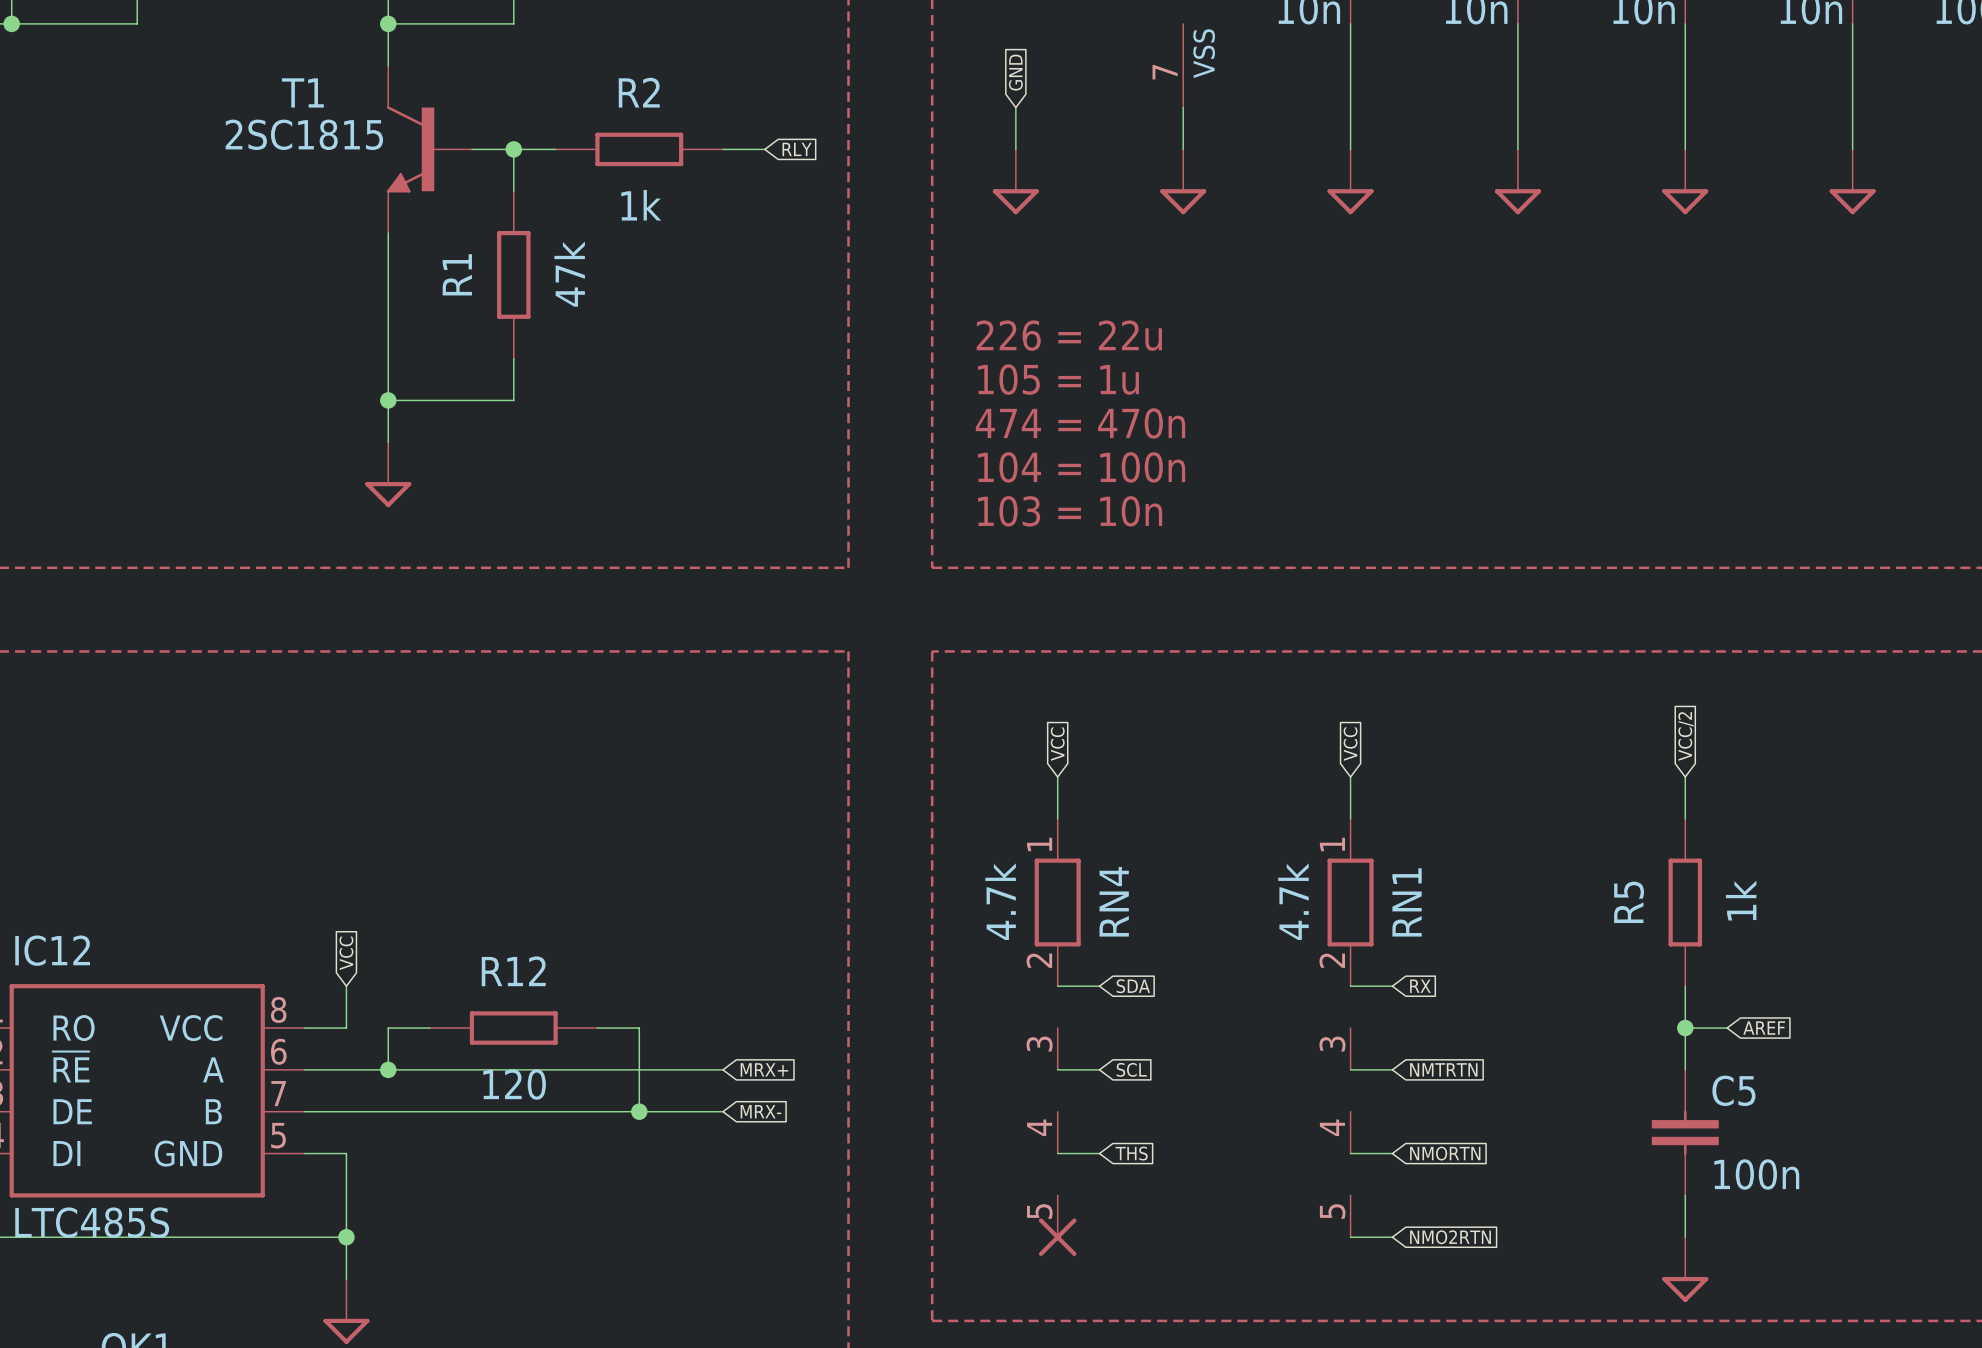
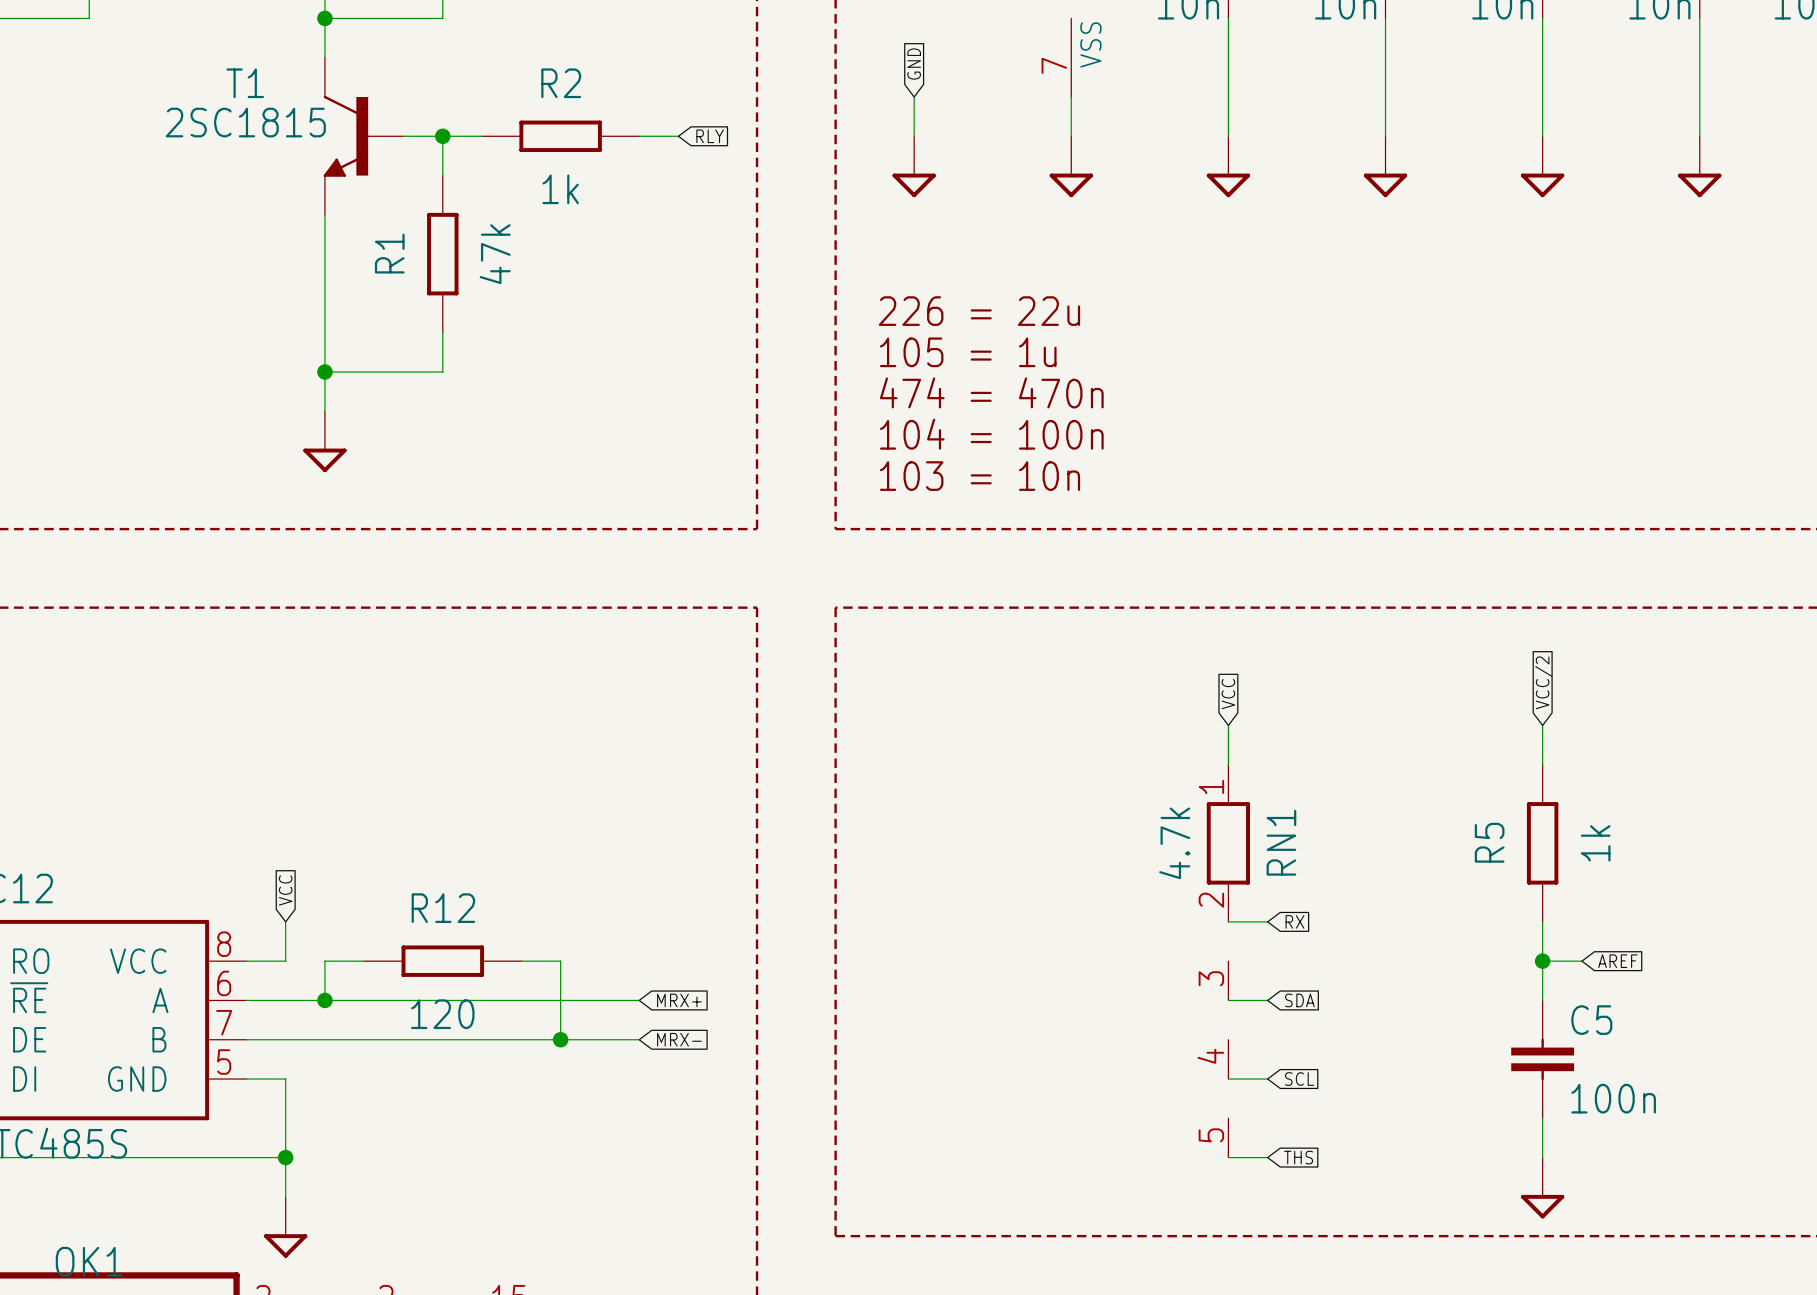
global label: VCC (1057, 744) -> none
wire: (1057, 777) (1057, 818) -> none
wire: (1057, 986) (1099, 986) -> none
global label: SDA (1133, 986) -> none
RN4: 4.7k (1057, 1028) -> none
wire: (1057, 1069) (1099, 1069) -> none
global label: SCL (1131, 1069) -> none
global label: NMTRTN (1443, 1069) -> SDA (1299, 1000)
wire: (1057, 1153) (1099, 1153) -> none
global label: THS (1131, 1153) -> none
global label: NMORTN (1445, 1153) -> SCL (1299, 1079)
part: (1057, 1237) -> none
global label: NMO2RTN (1450, 1237) -> THS (1298, 1157)

